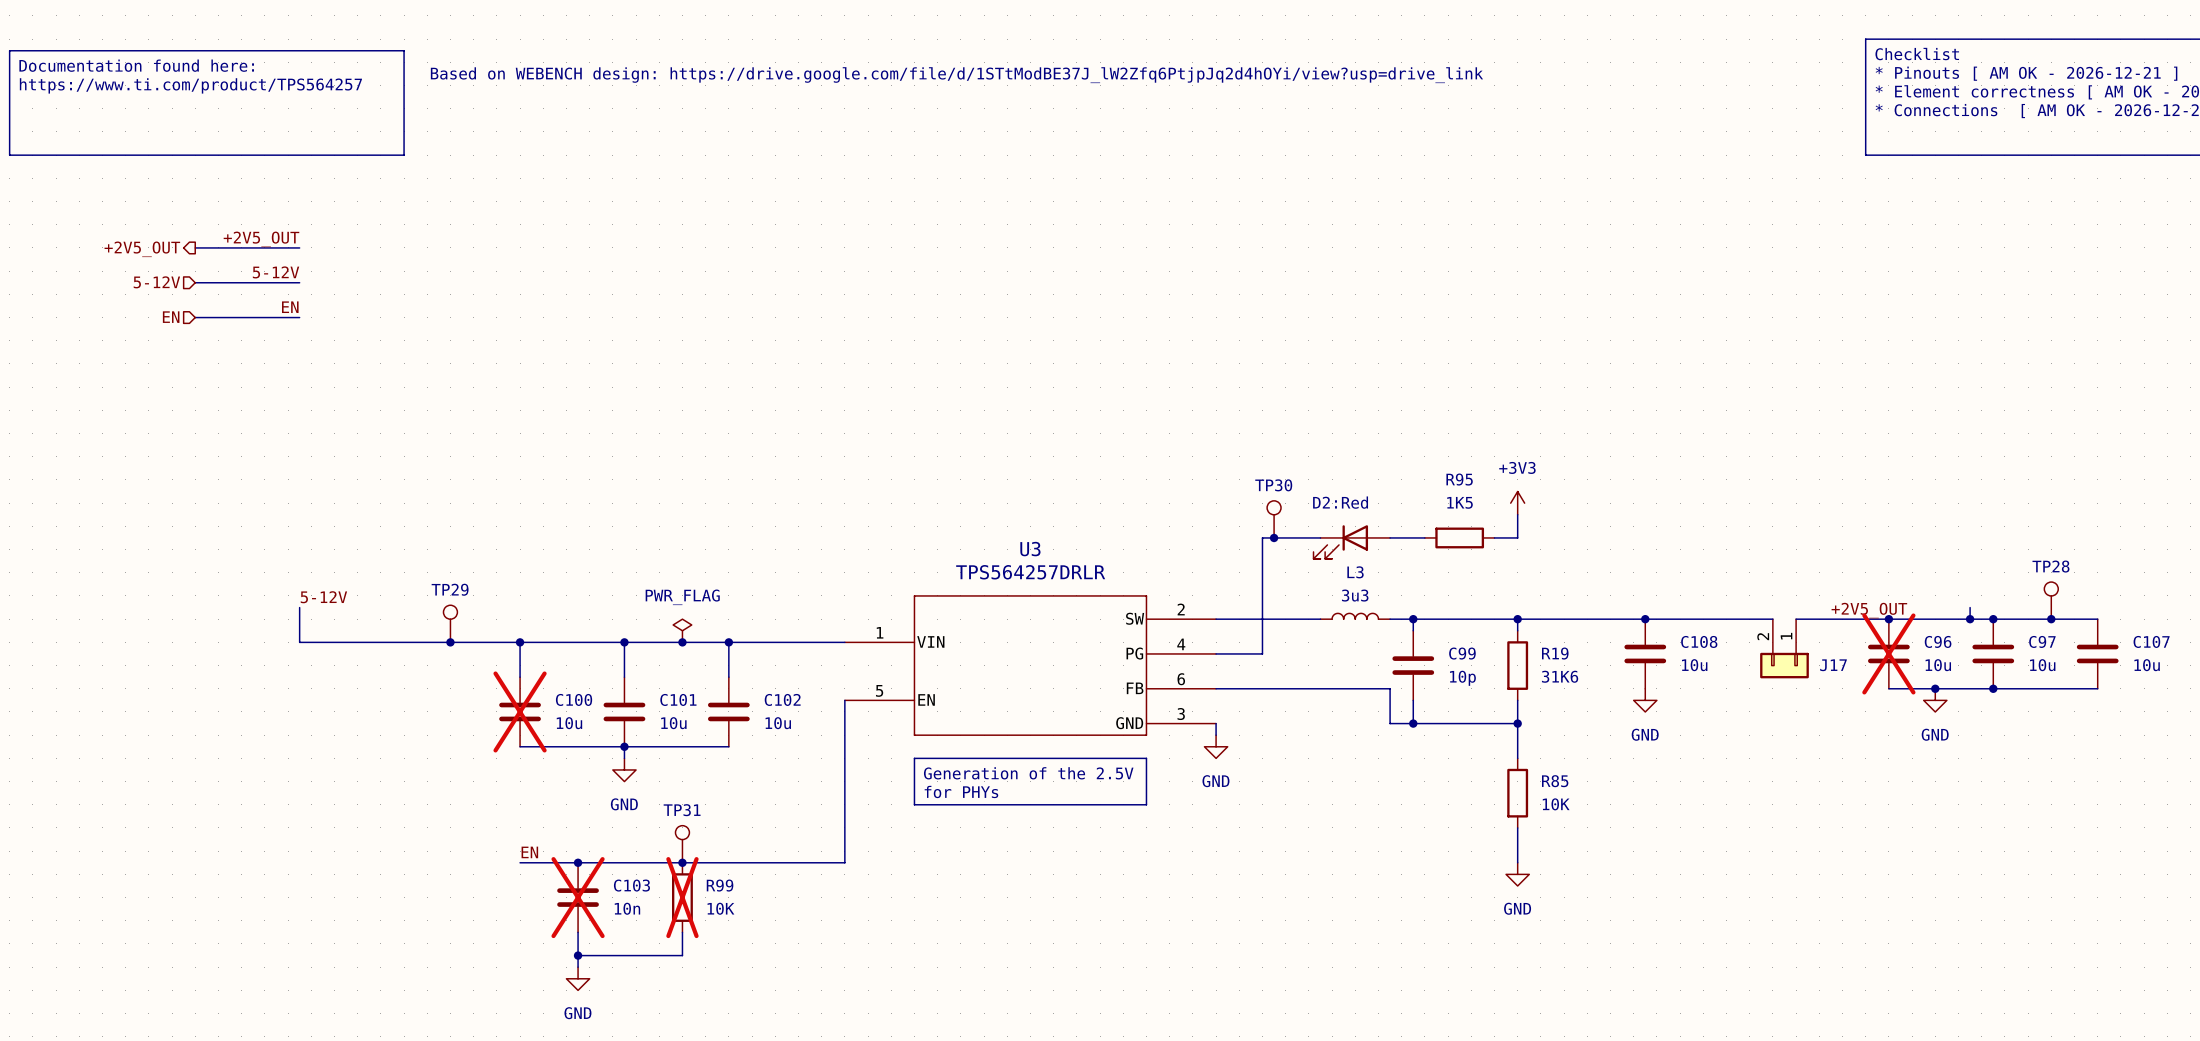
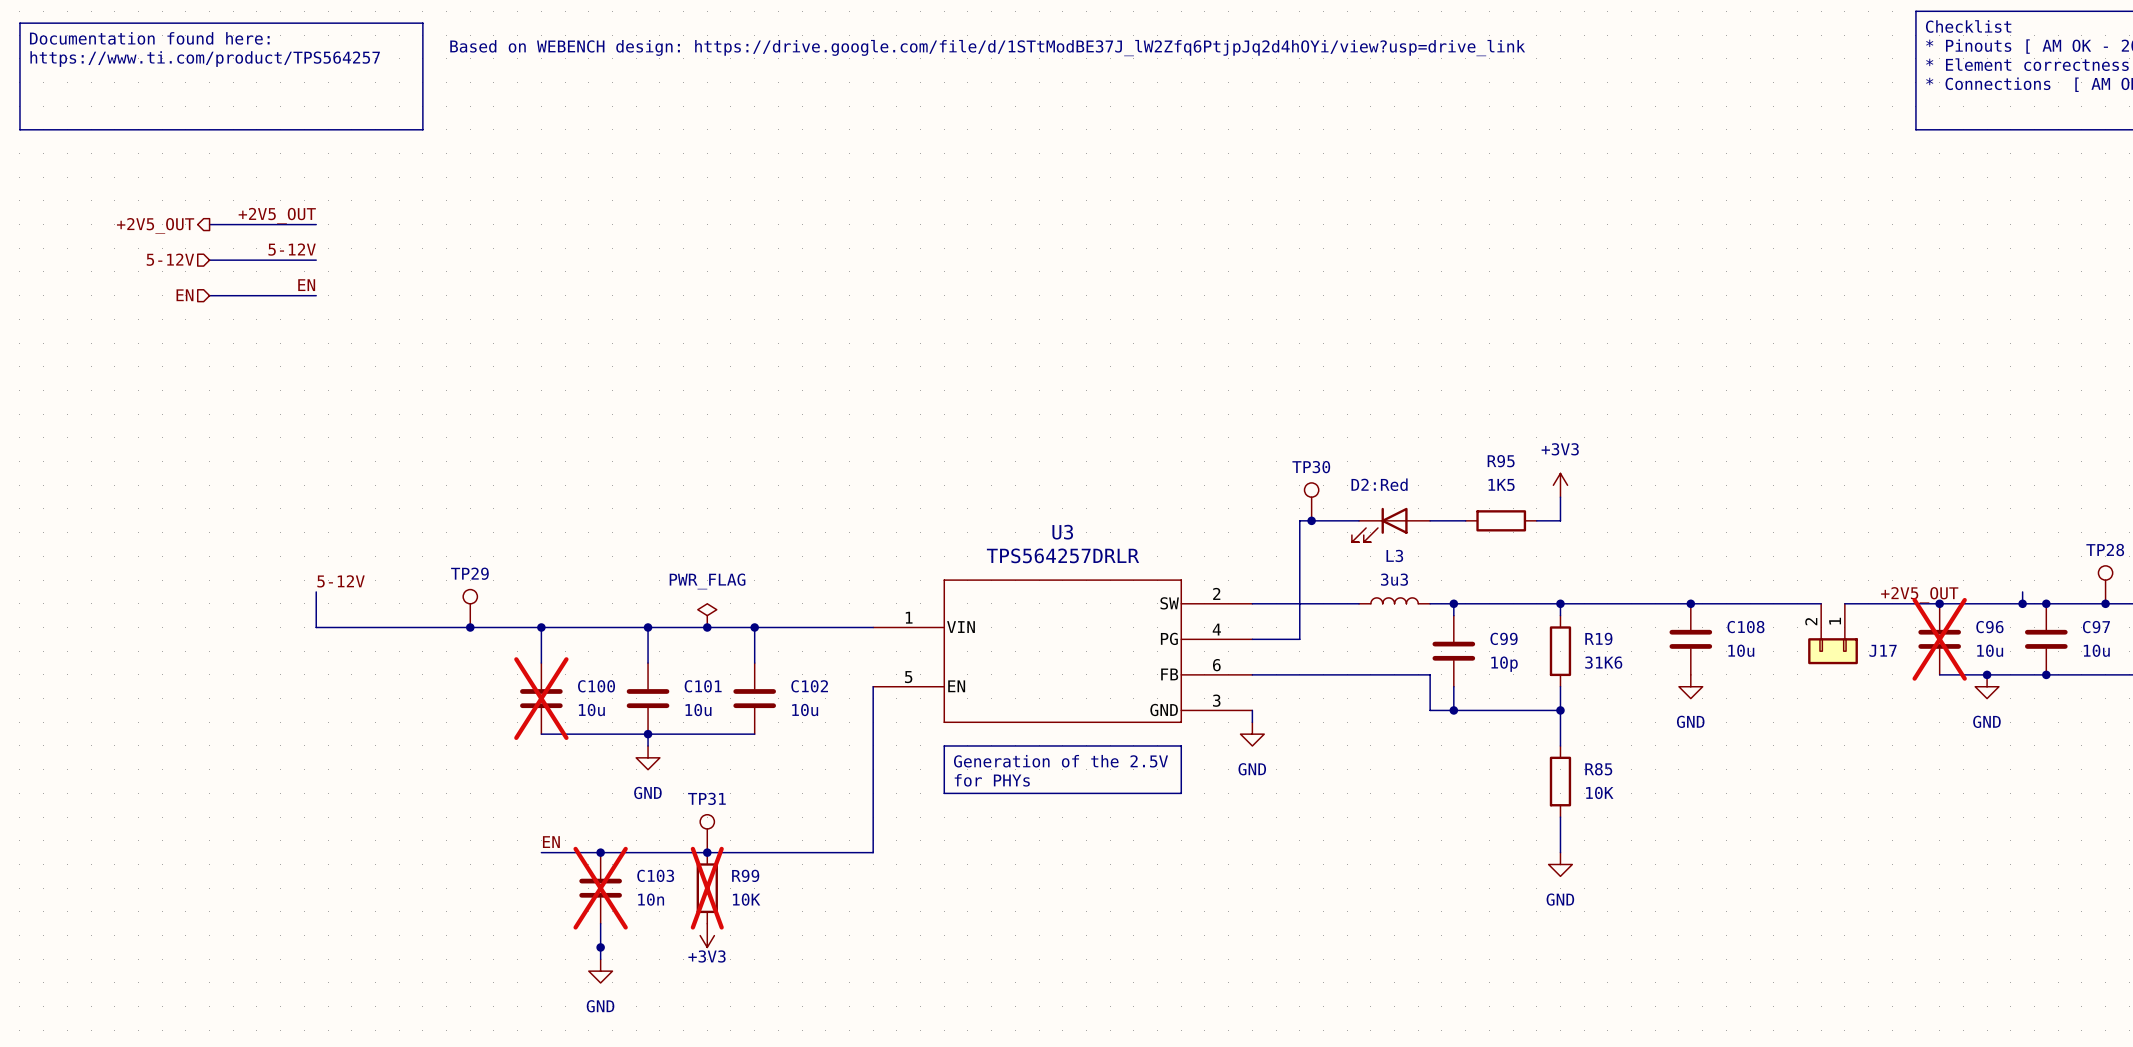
wire: (682, 932) (682, 955) (578, 955) -> none
power symbol: none -> +3V3 (707, 935)

